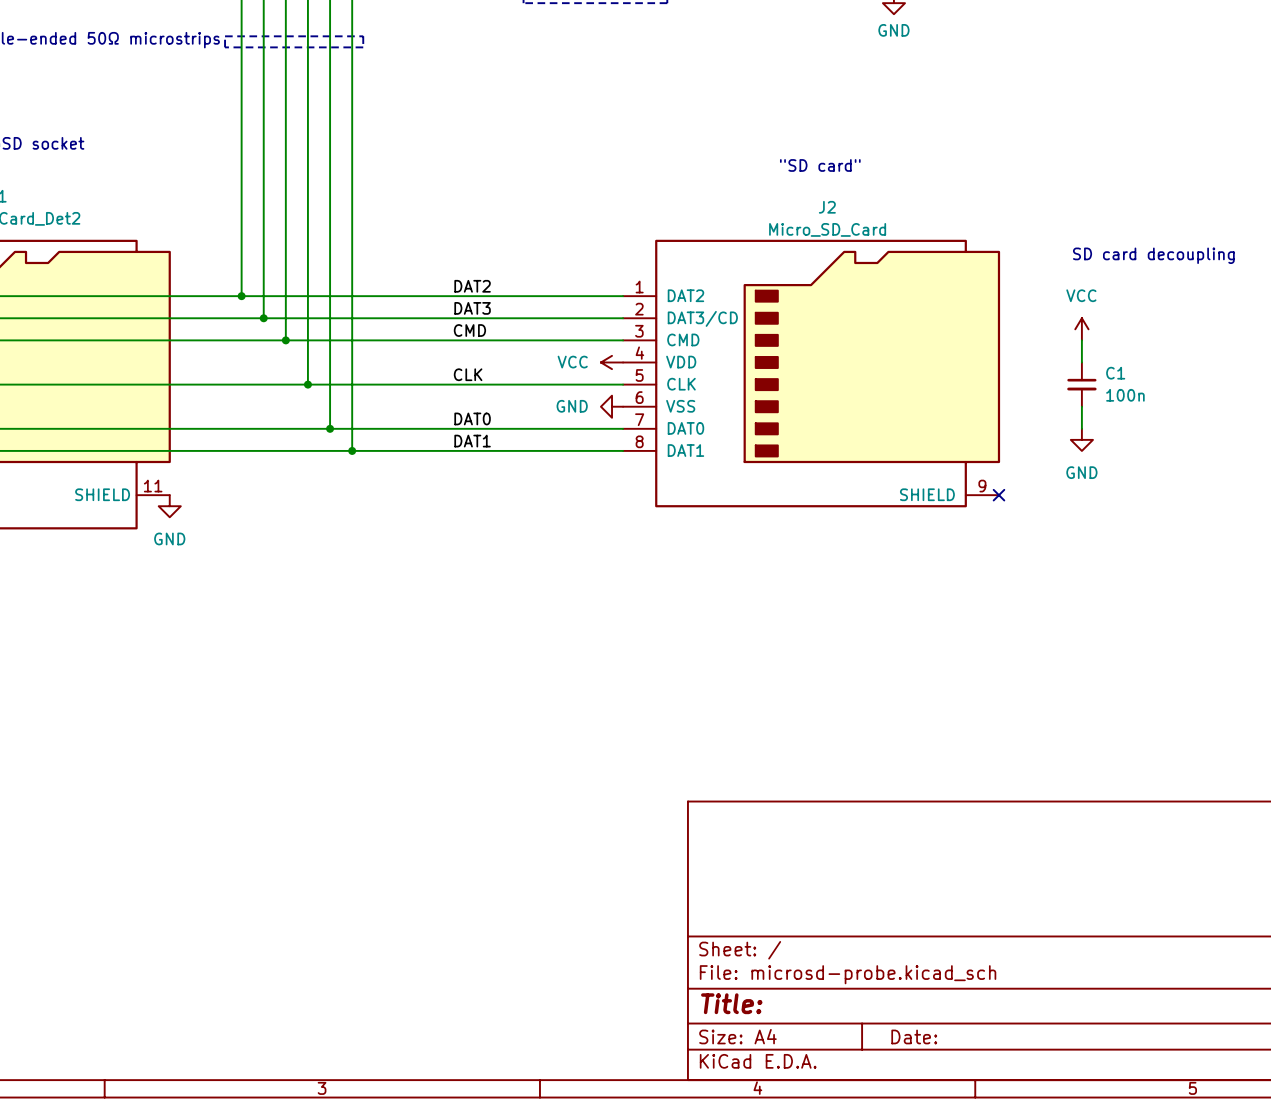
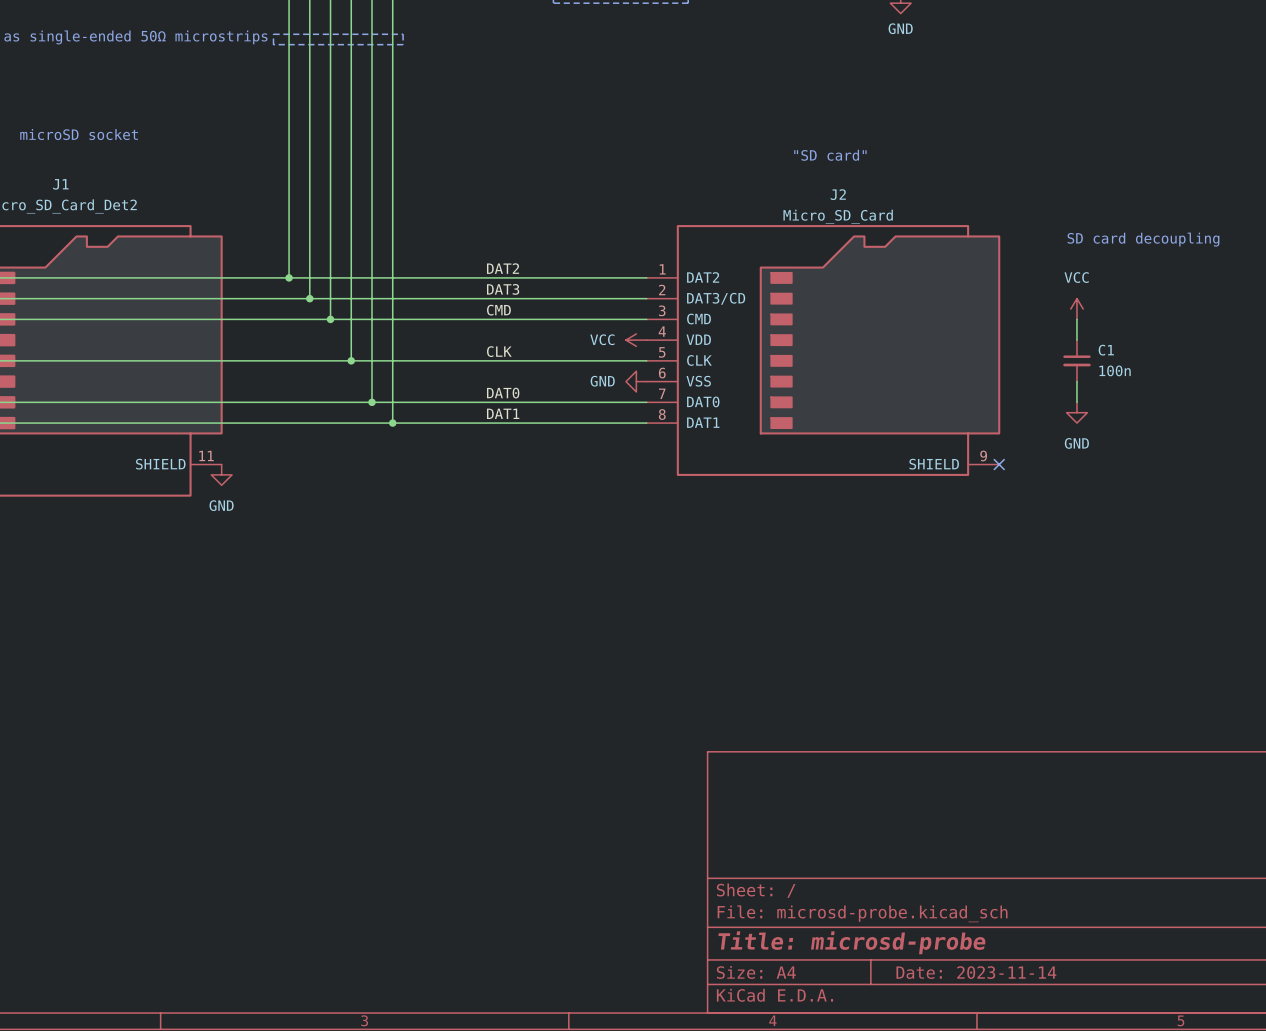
title block: Title: (731, 1003) -> Title: microsd-probe (852, 942)
title block: Date: (914, 1036) -> Date: 2023-11-14 (976, 972)

